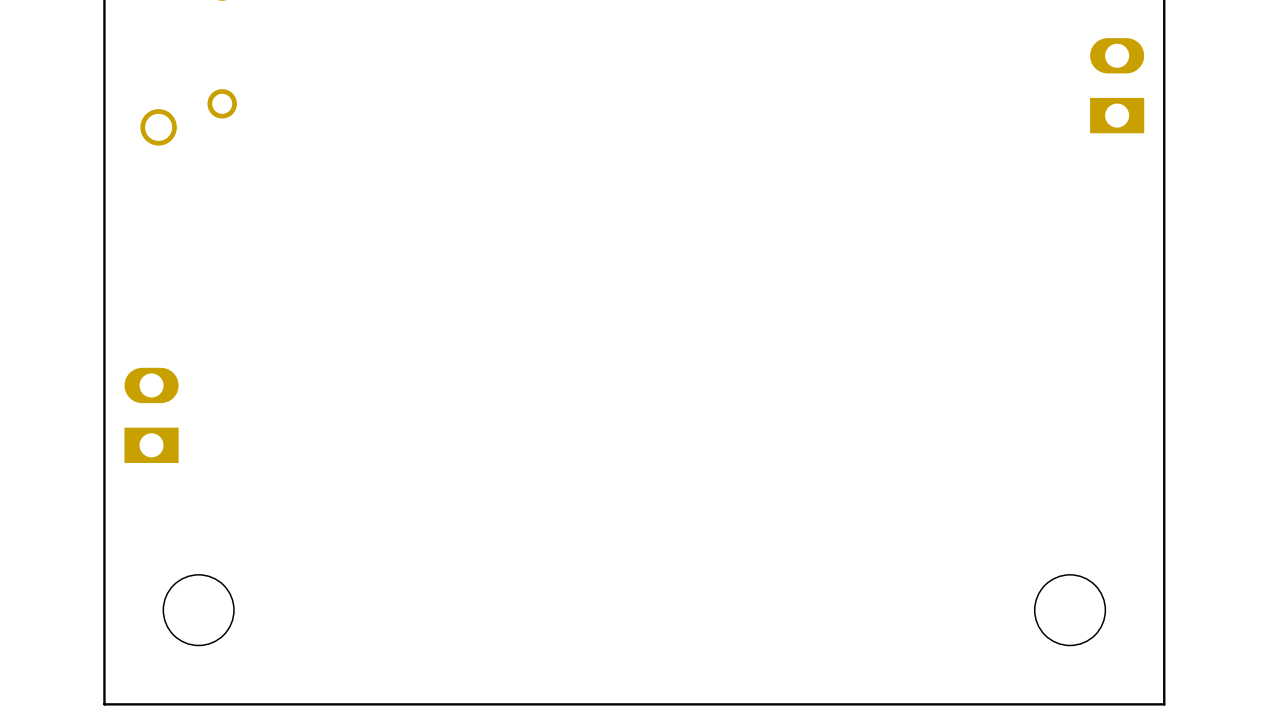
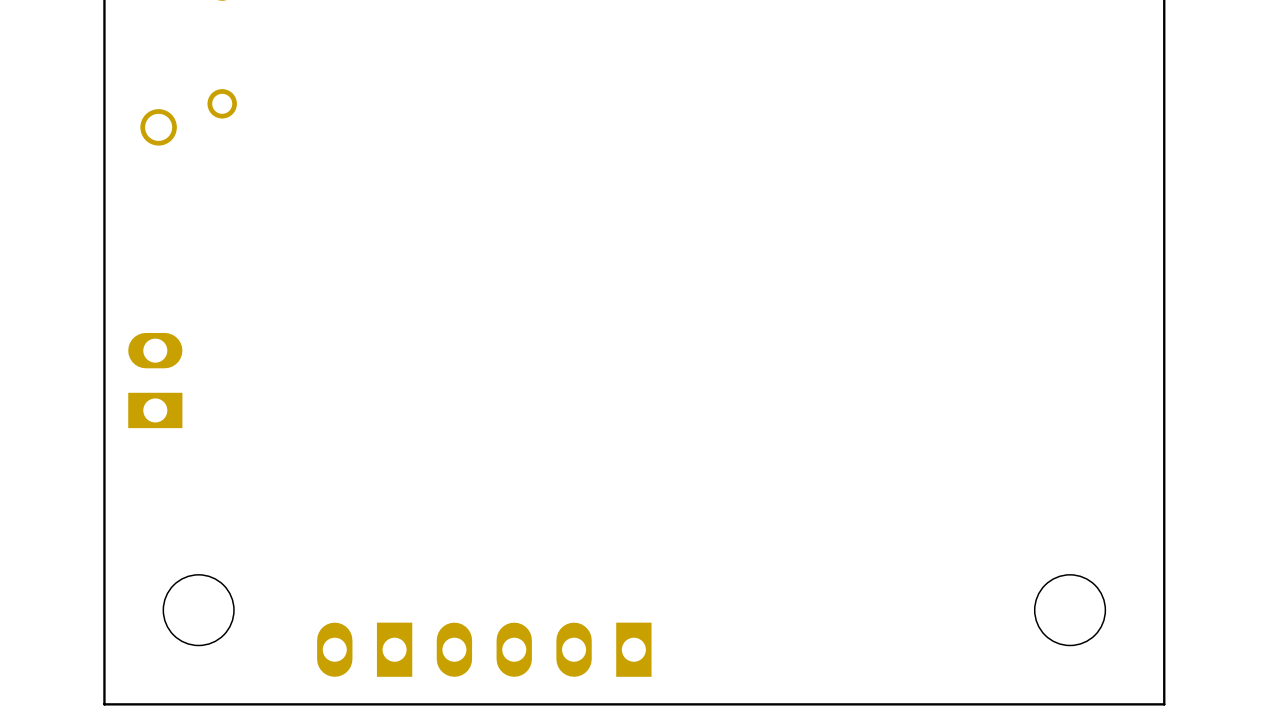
part: (1117, 85) -> none
part position: (151, 415) -> (155, 380)
part: none -> (364, 649)
part: none -> (544, 649)

